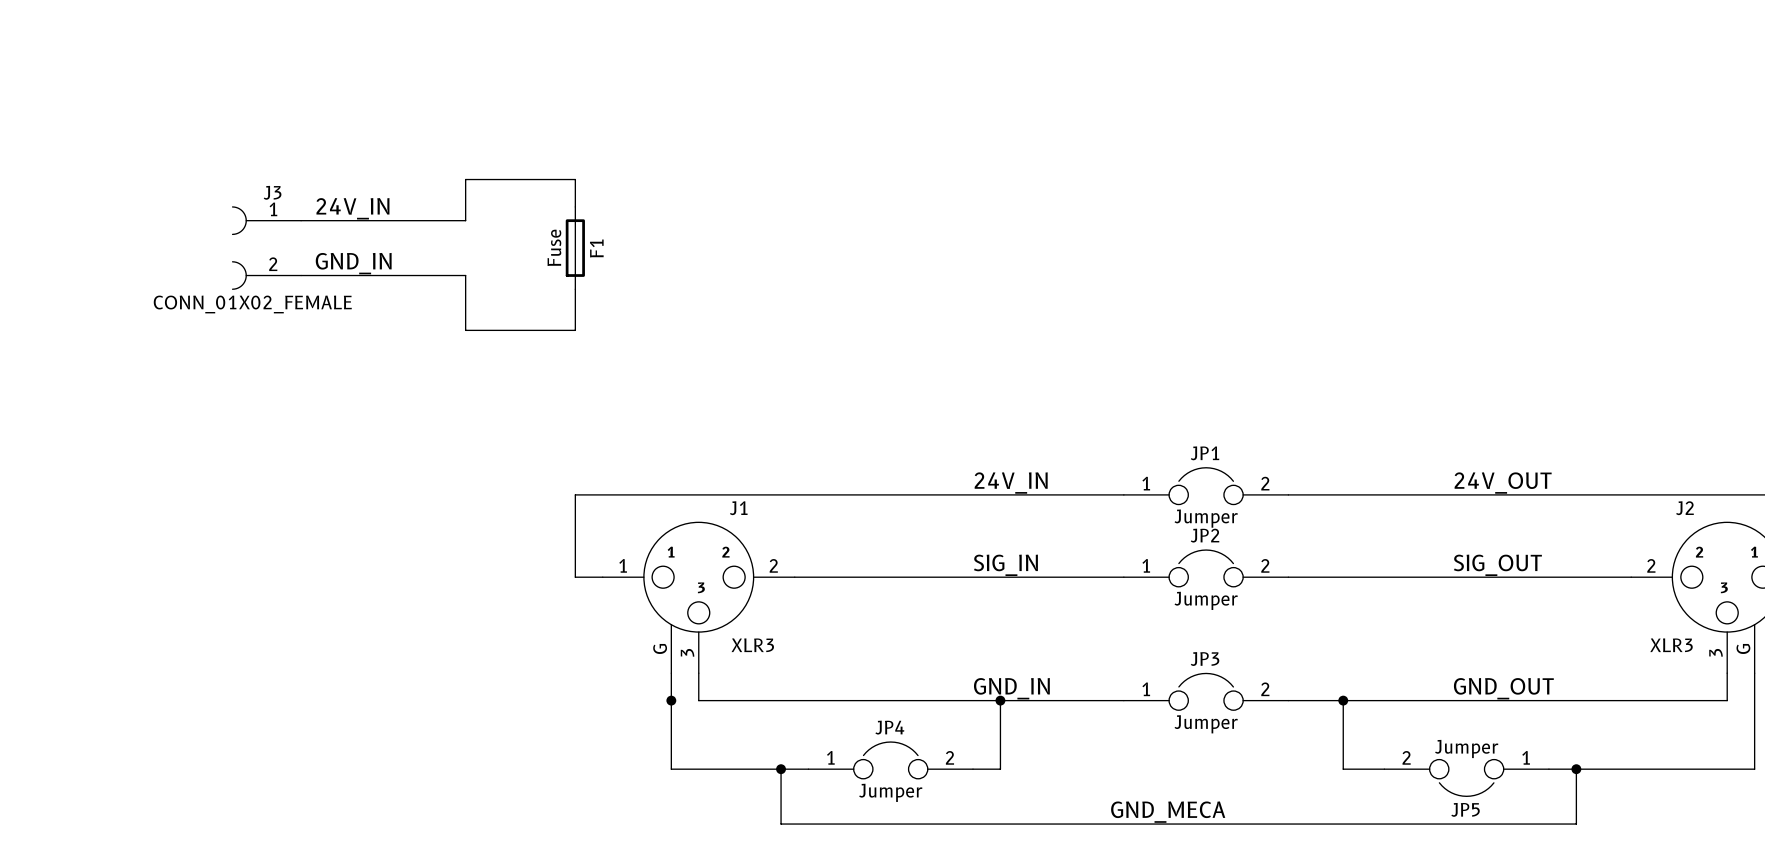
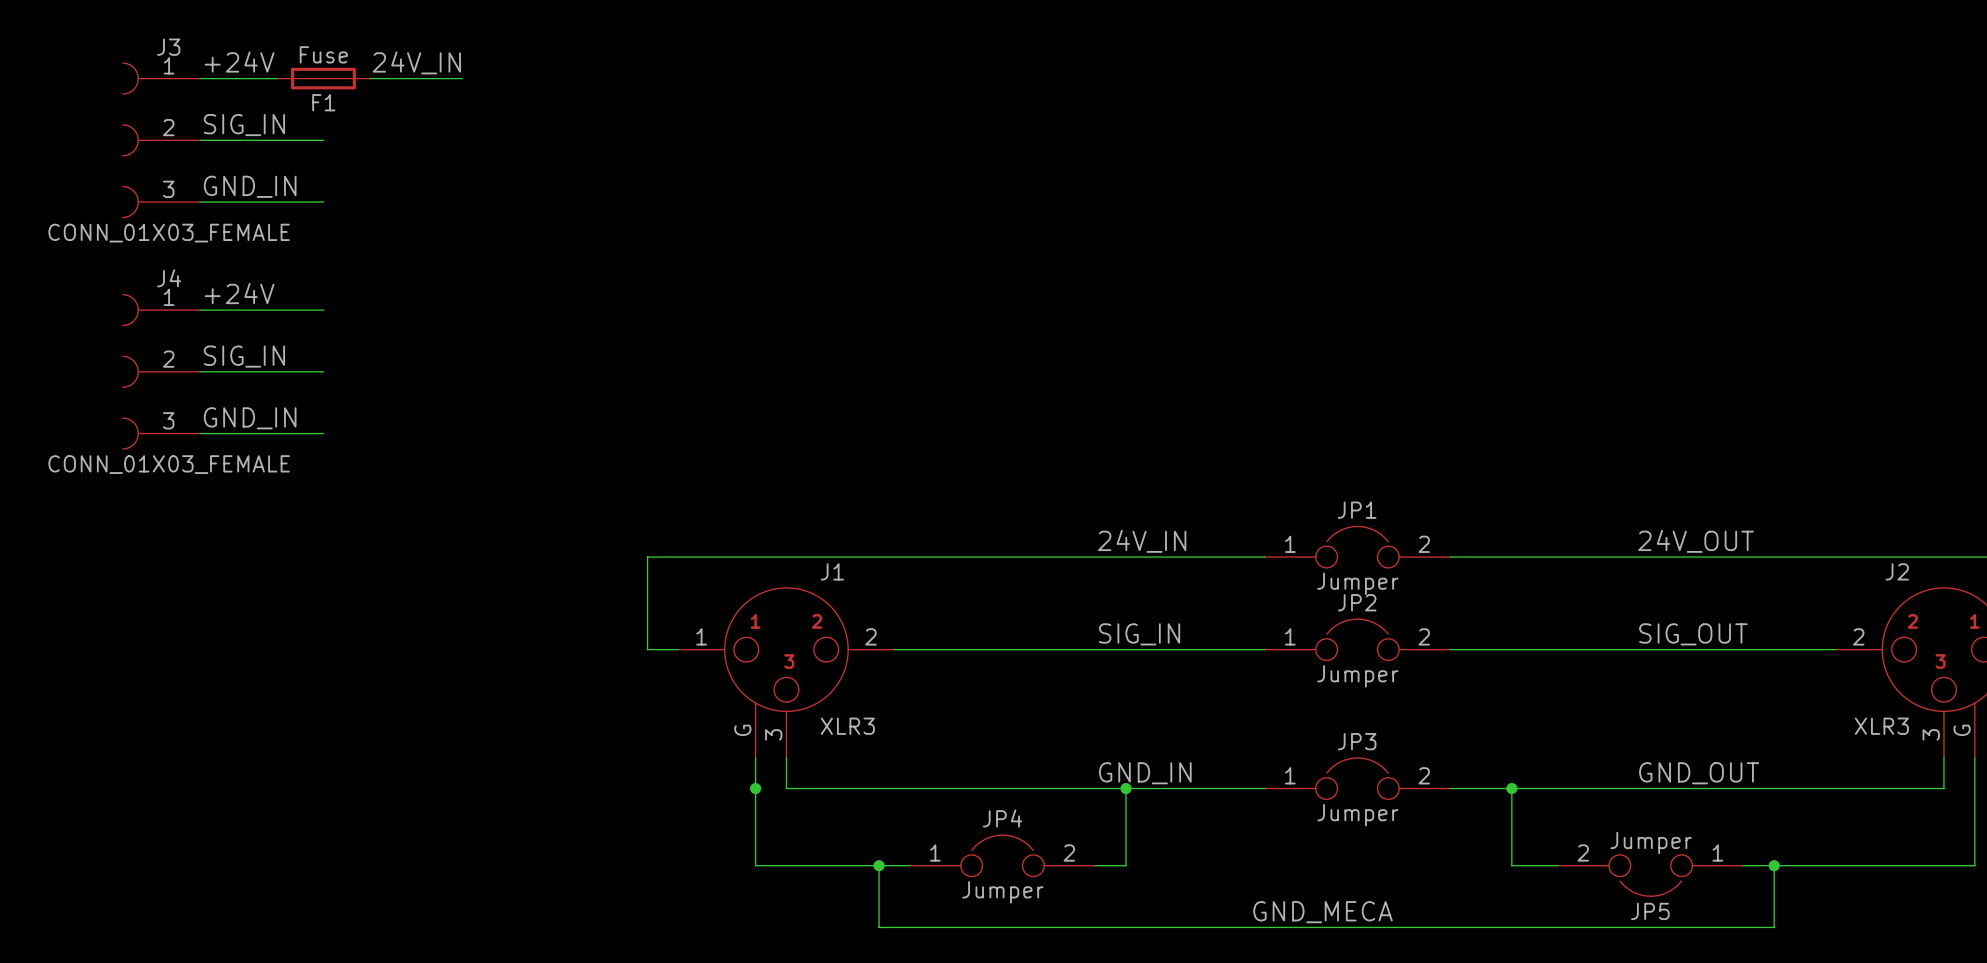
label: none -> +24V (239, 61)
wire: none -> (199, 78) (277, 78)
wire: none -> (369, 78) (462, 78)
label: none -> SIG_IN (244, 125)
wire: none -> (199, 140) (323, 140)
label: none -> GND_IN (250, 186)
wire: none -> (199, 202) (323, 202)
J3 name position: J3 (272, 192) -> J3 (168, 47)
J3 symbol: [232, 206, 302, 290] -> [122, 63, 200, 218]
wire: (575, 206) (575, 179) (465, 179) (465, 220) (301, 220) -> none
label position: 24V_IN (352, 208) -> 24V_IN (416, 62)
F1 rotation: 0° (575, 248) -> 90° clockwise (323, 78)
F1 position: (575, 248) -> (323, 78)
label: none -> +24V (239, 293)
label: GND_IN (353, 263) -> none
wire: none -> (199, 310) (323, 310)
wire: (301, 275) (465, 275) (465, 330) (575, 330) (575, 289) -> none
J3 value: CONN_01X02_FEMALE (252, 304) -> CONN_01X03_FEMALE (169, 233)
label: none -> SIG_IN (244, 356)
J4: none -> CONN_01X03_FEMALE (161, 371)
wire: none -> (199, 371) (323, 371)
label: none -> GND_IN (250, 418)
wire: none -> (199, 433) (323, 433)

